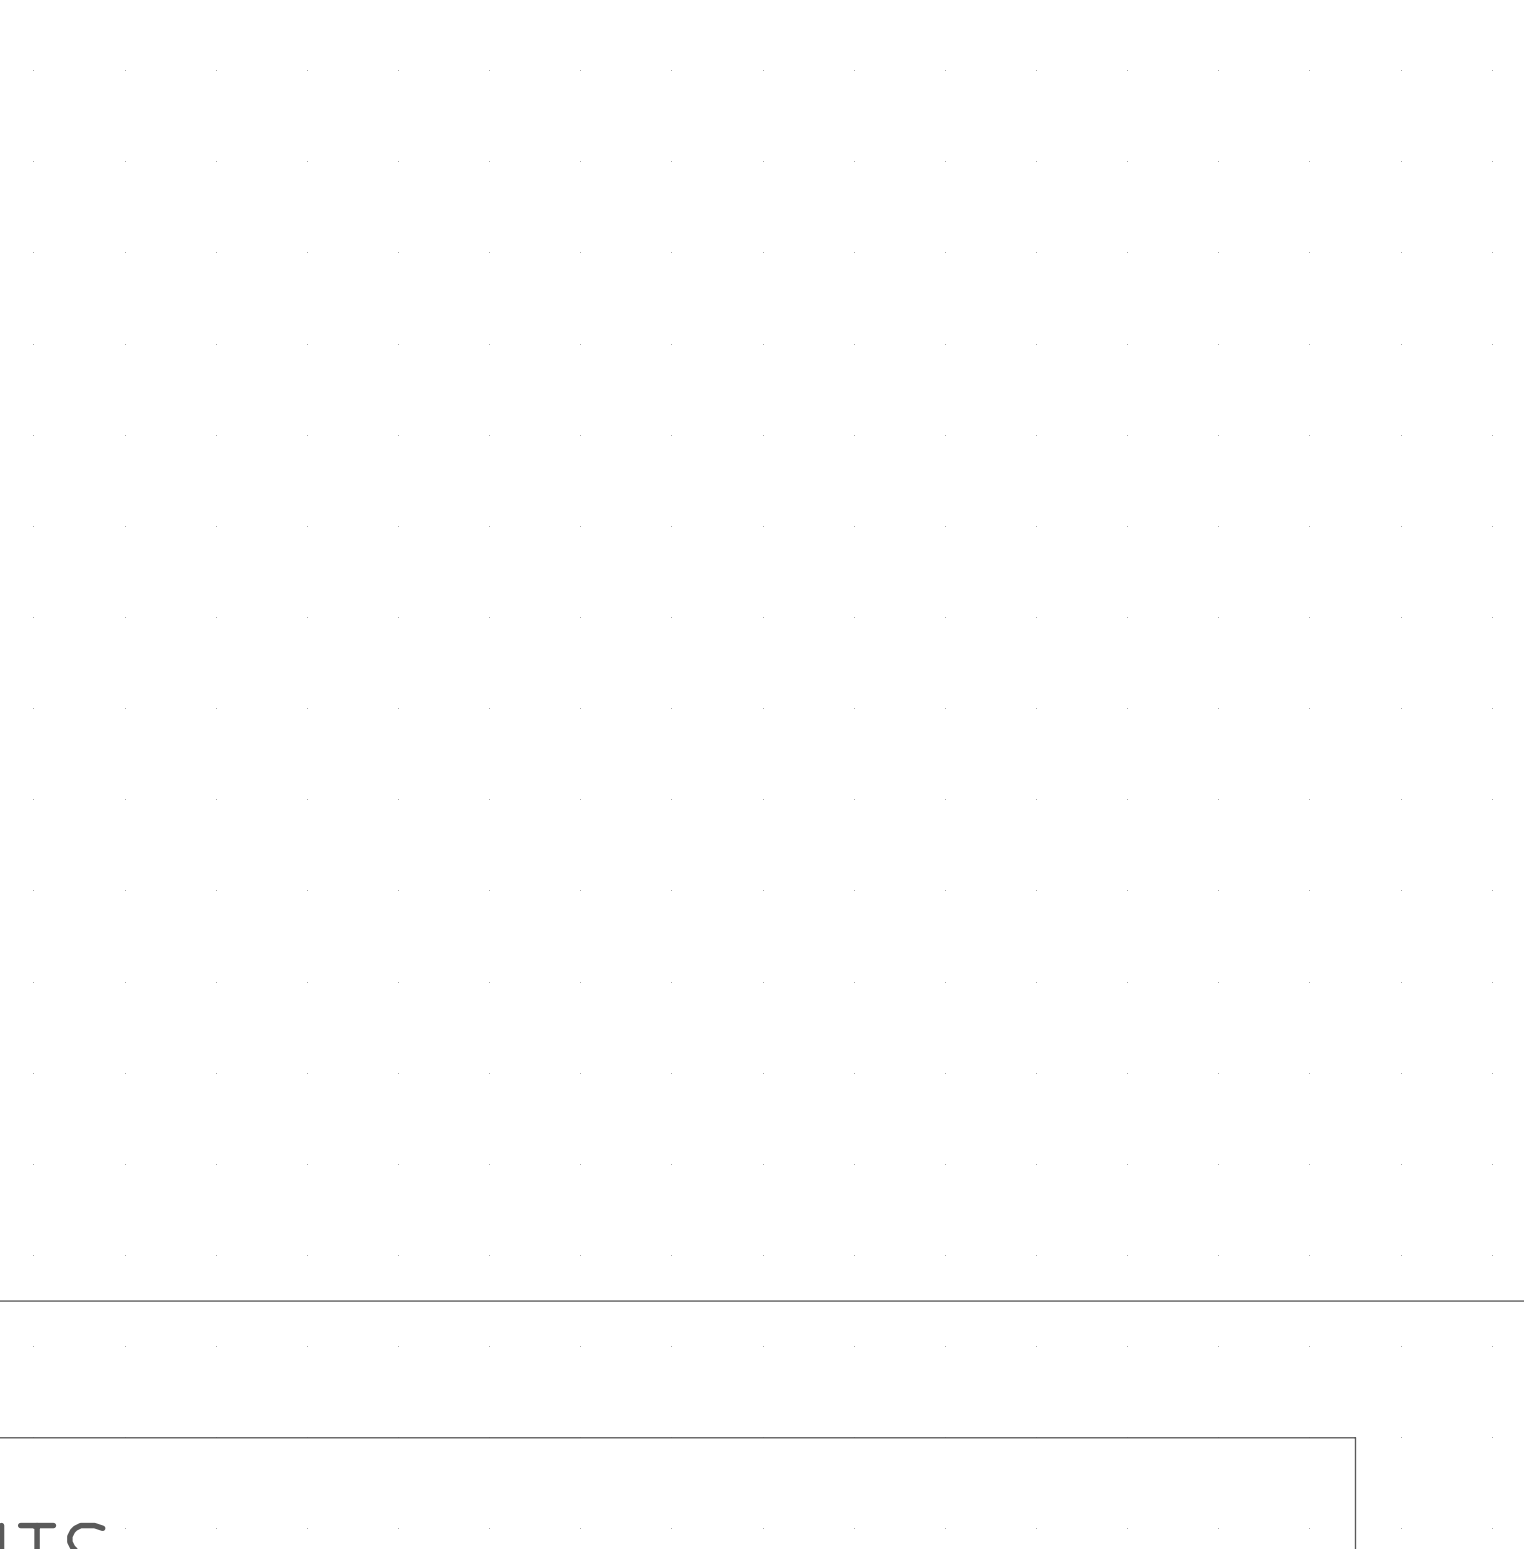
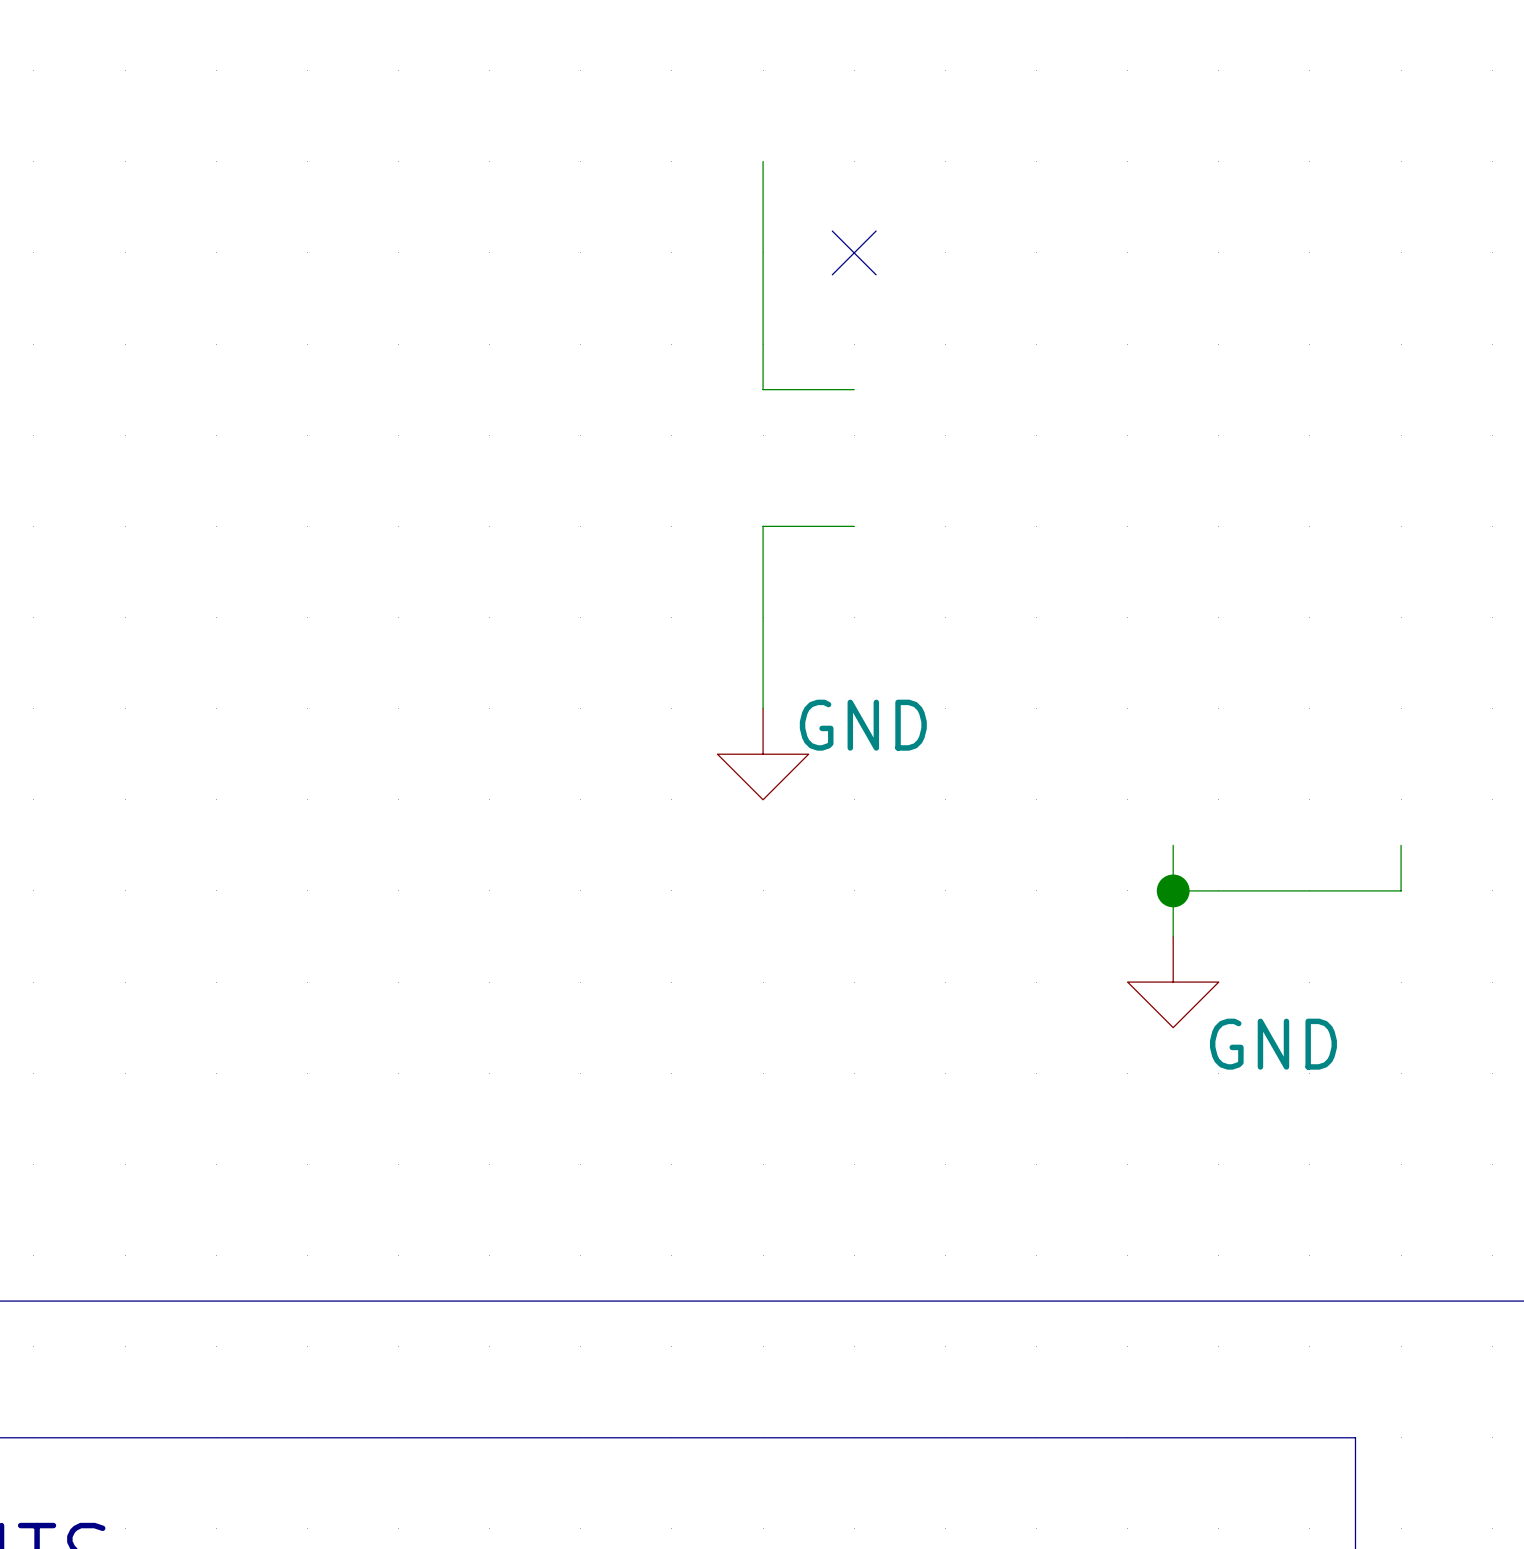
wire: none -> (763, 161) (763, 389) (854, 389)
no-connect mark: none -> (854, 252)
wire: none -> (854, 526) (763, 526) (763, 708)
power symbol: none -> GND (763, 754)
wire: none -> (1173, 845) (1173, 936)
wire: none -> (1401, 845) (1401, 890) (1173, 890)
junction: none -> (1173, 890)
power symbol: none -> GND (1173, 982)

